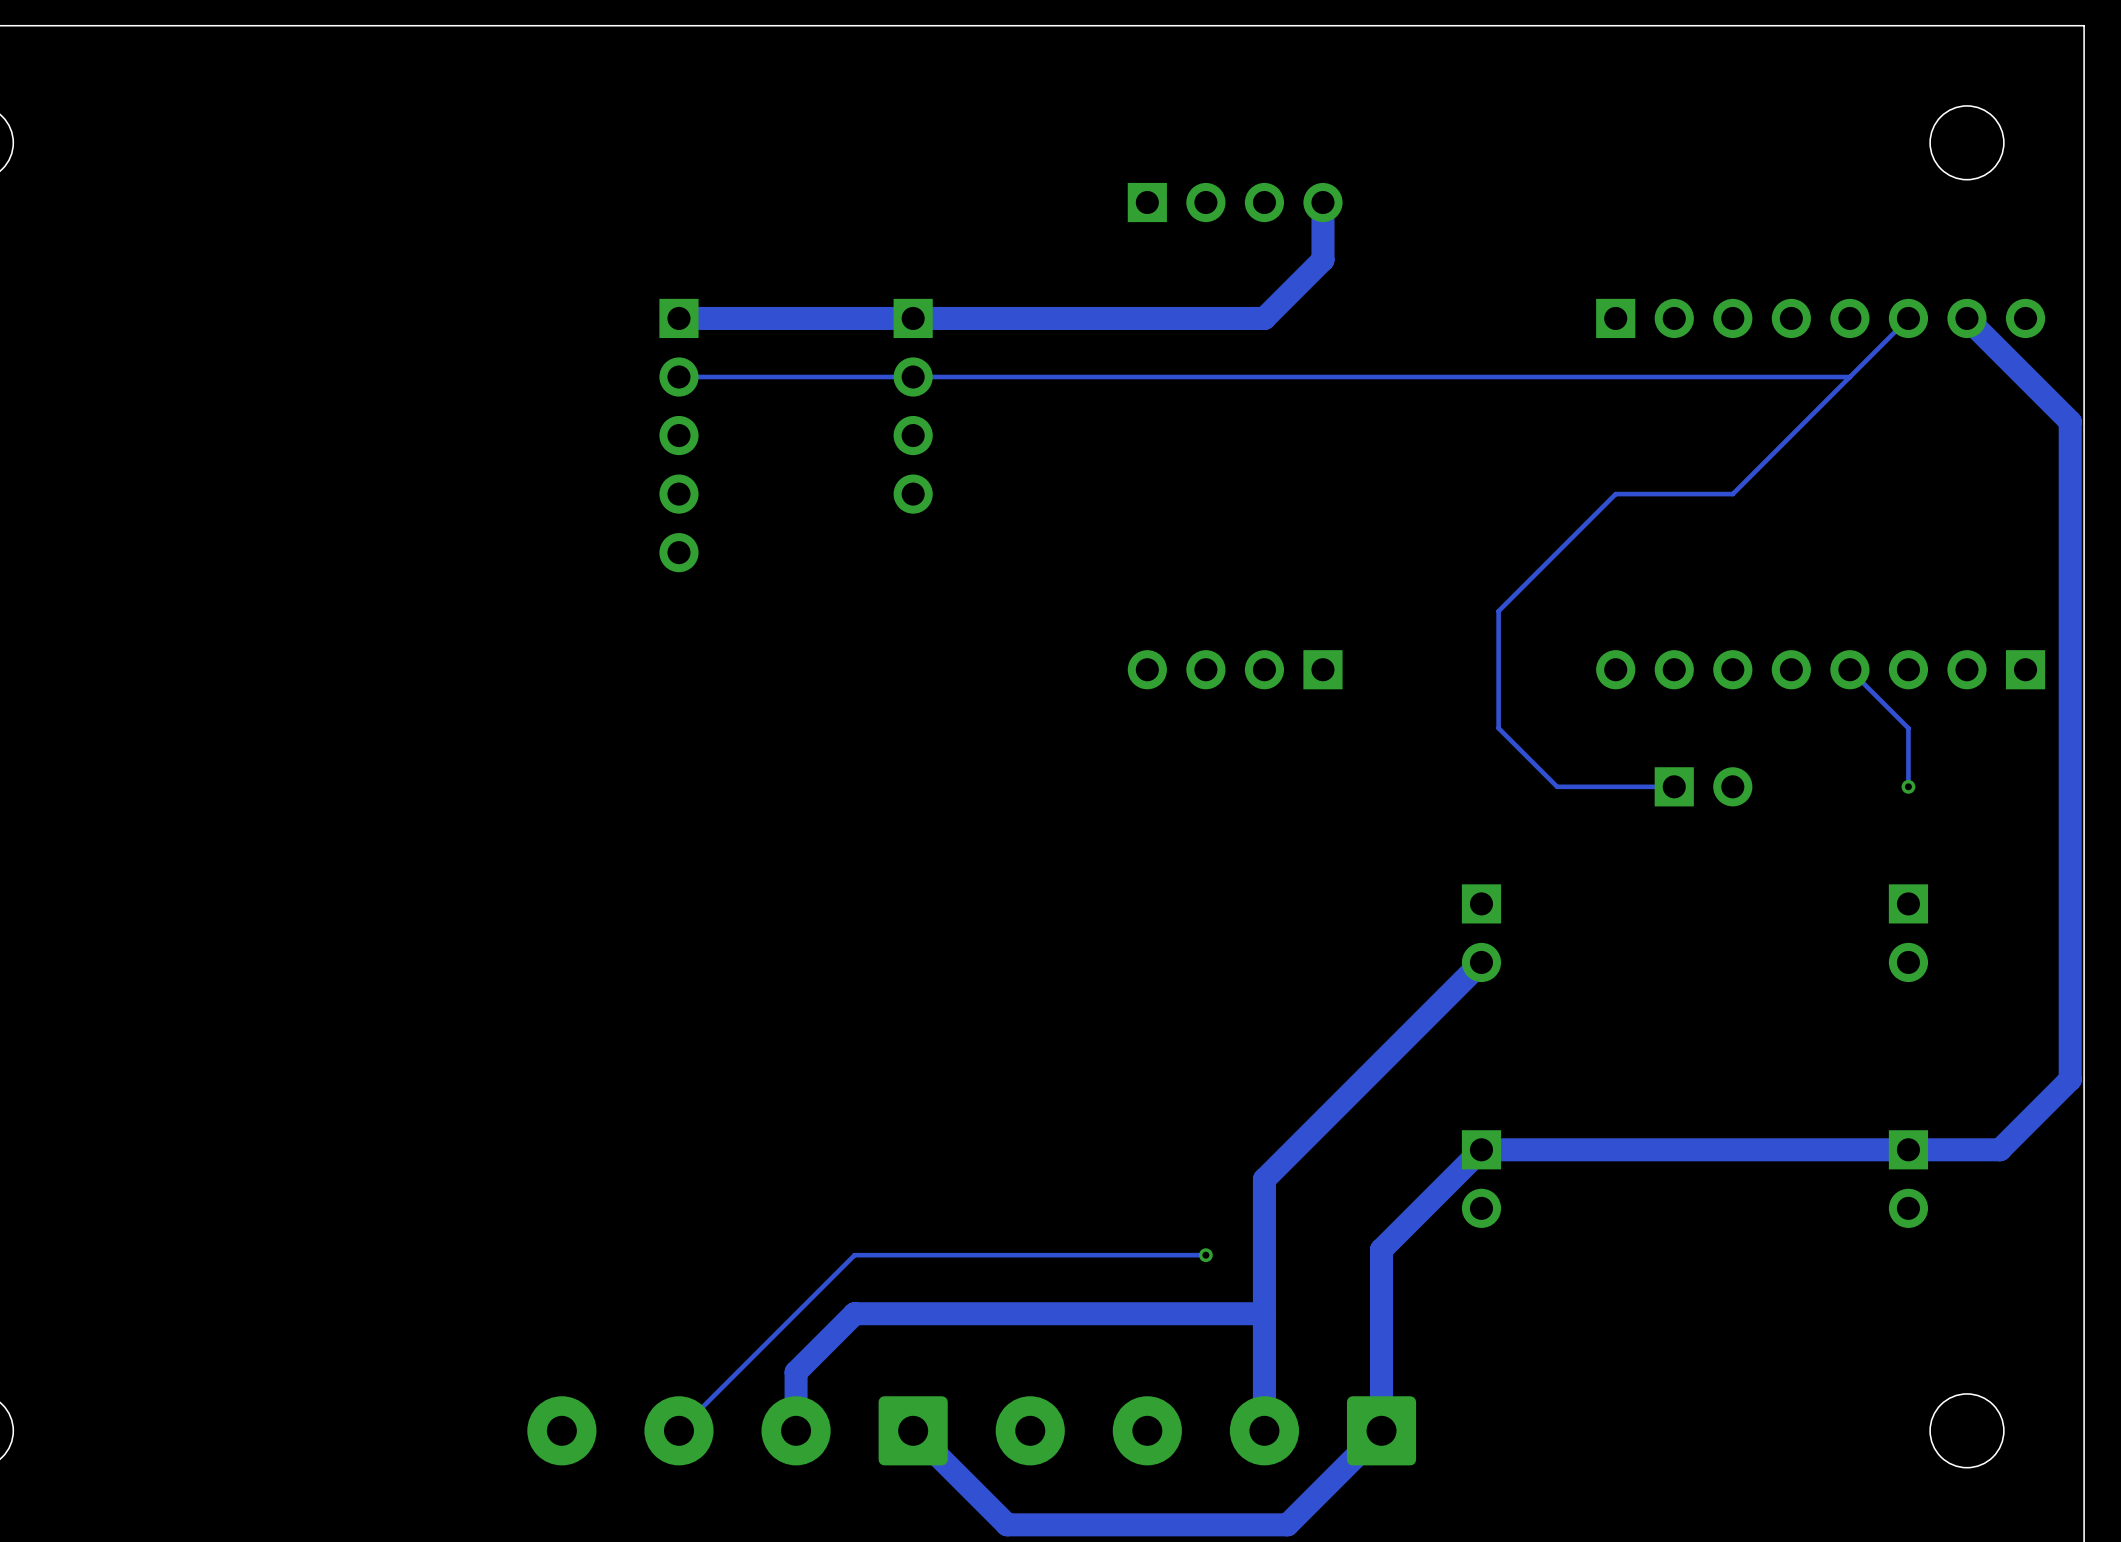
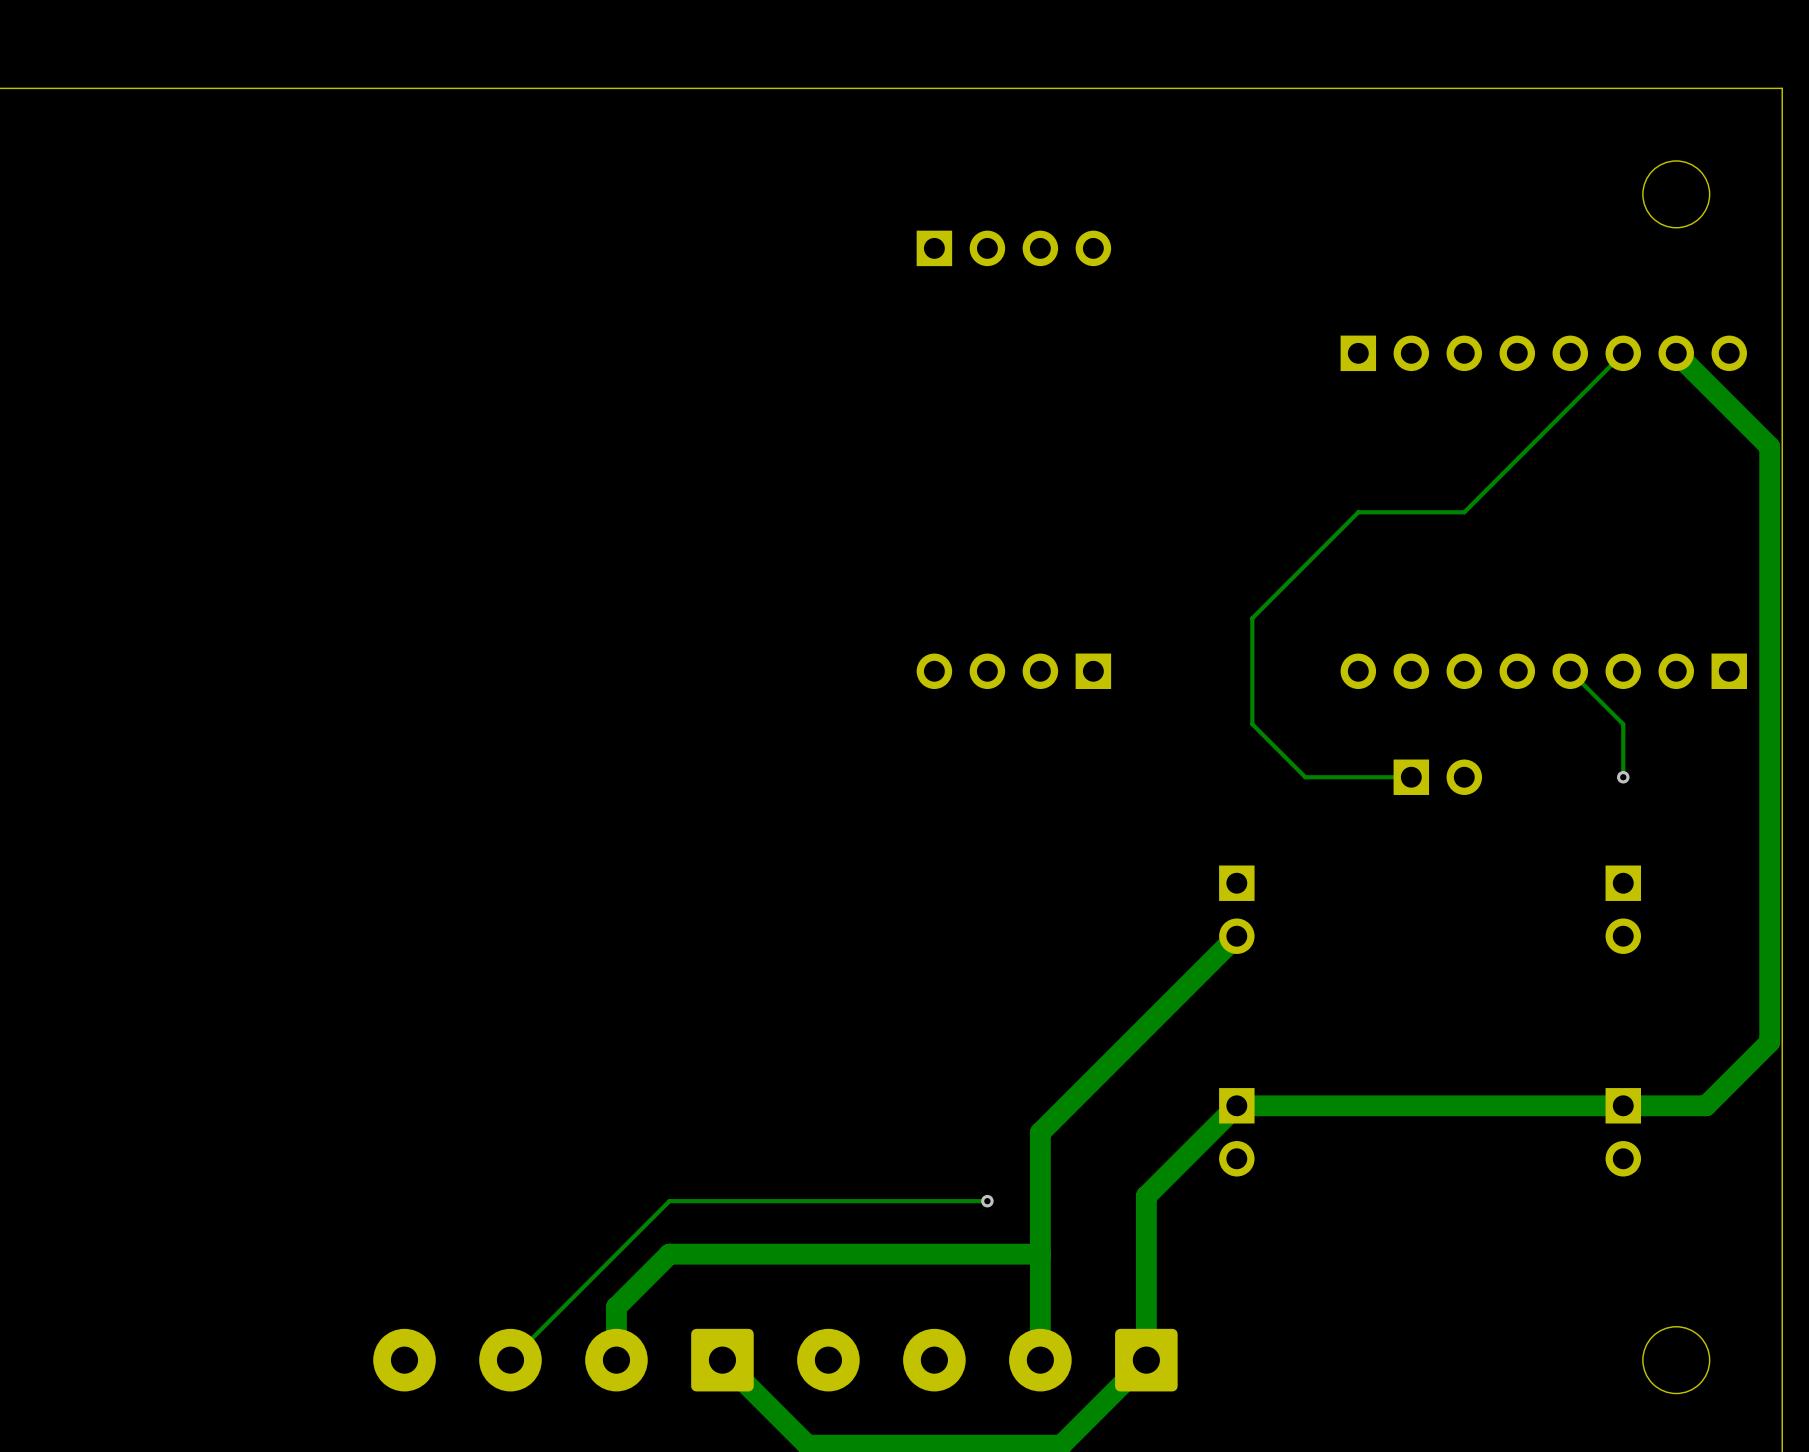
track: (1322, 202) (1322, 259) (1264, 318) (678, 318) -> none
track: (1849, 376) (678, 376) -> none
part: (913, 406) -> none
part: (678, 435) -> none

